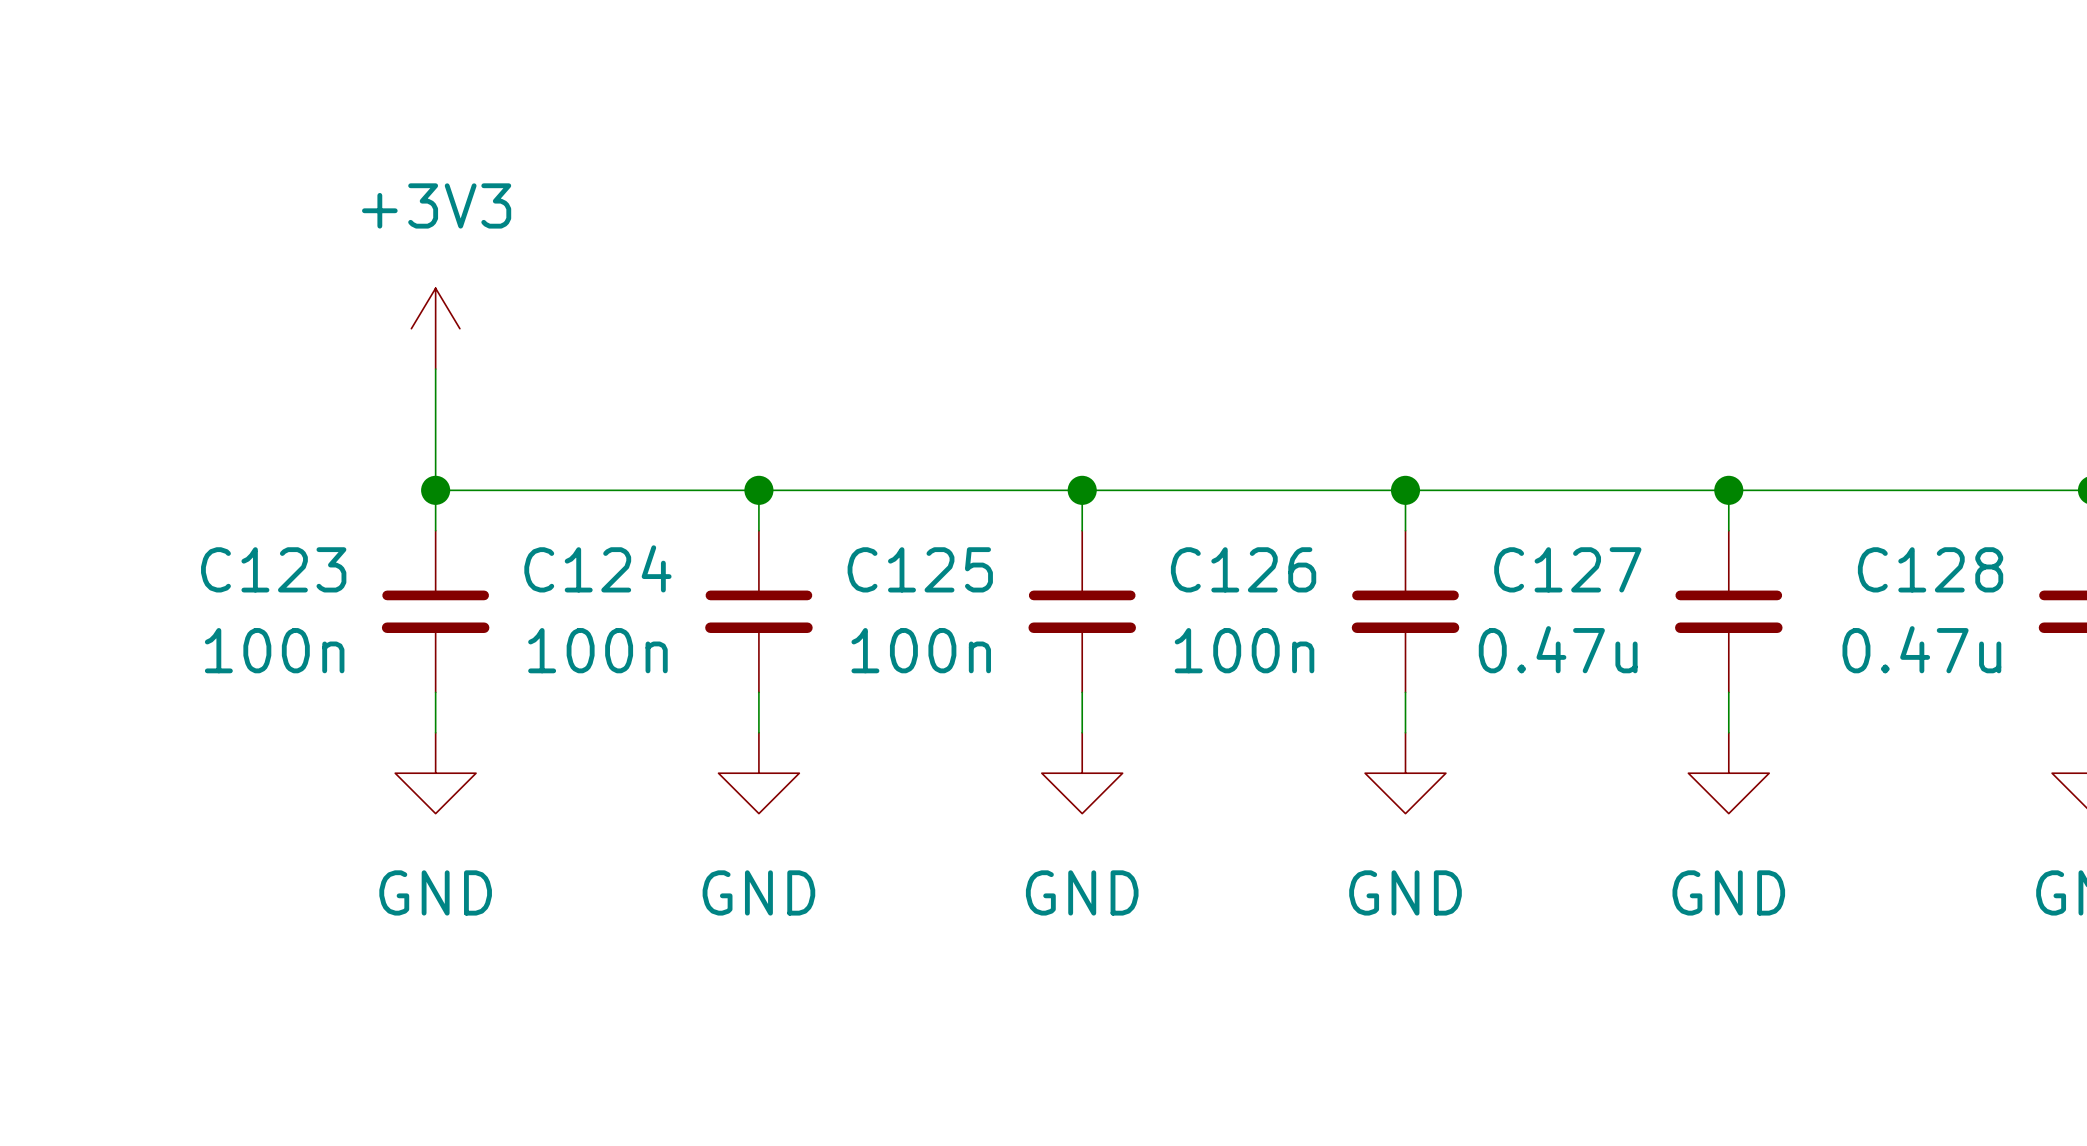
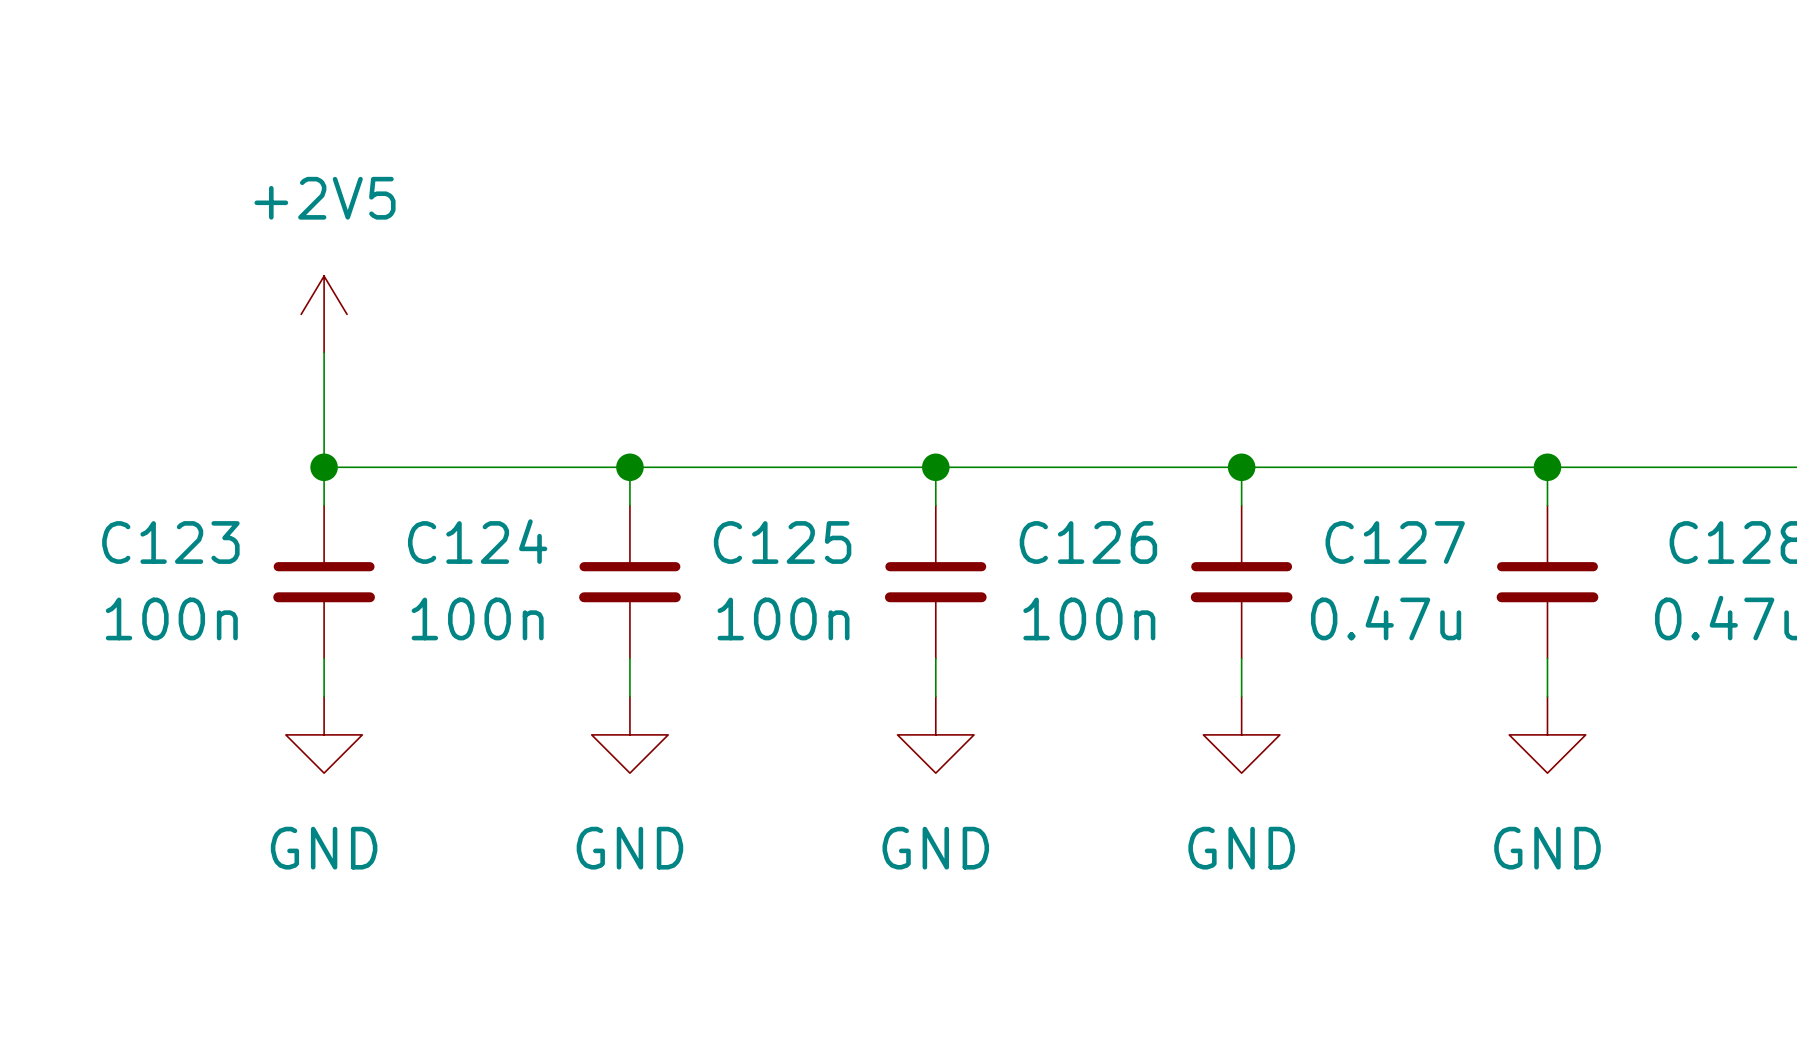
power symbol: +3V3 (435, 328) -> +2V5 (324, 314)

